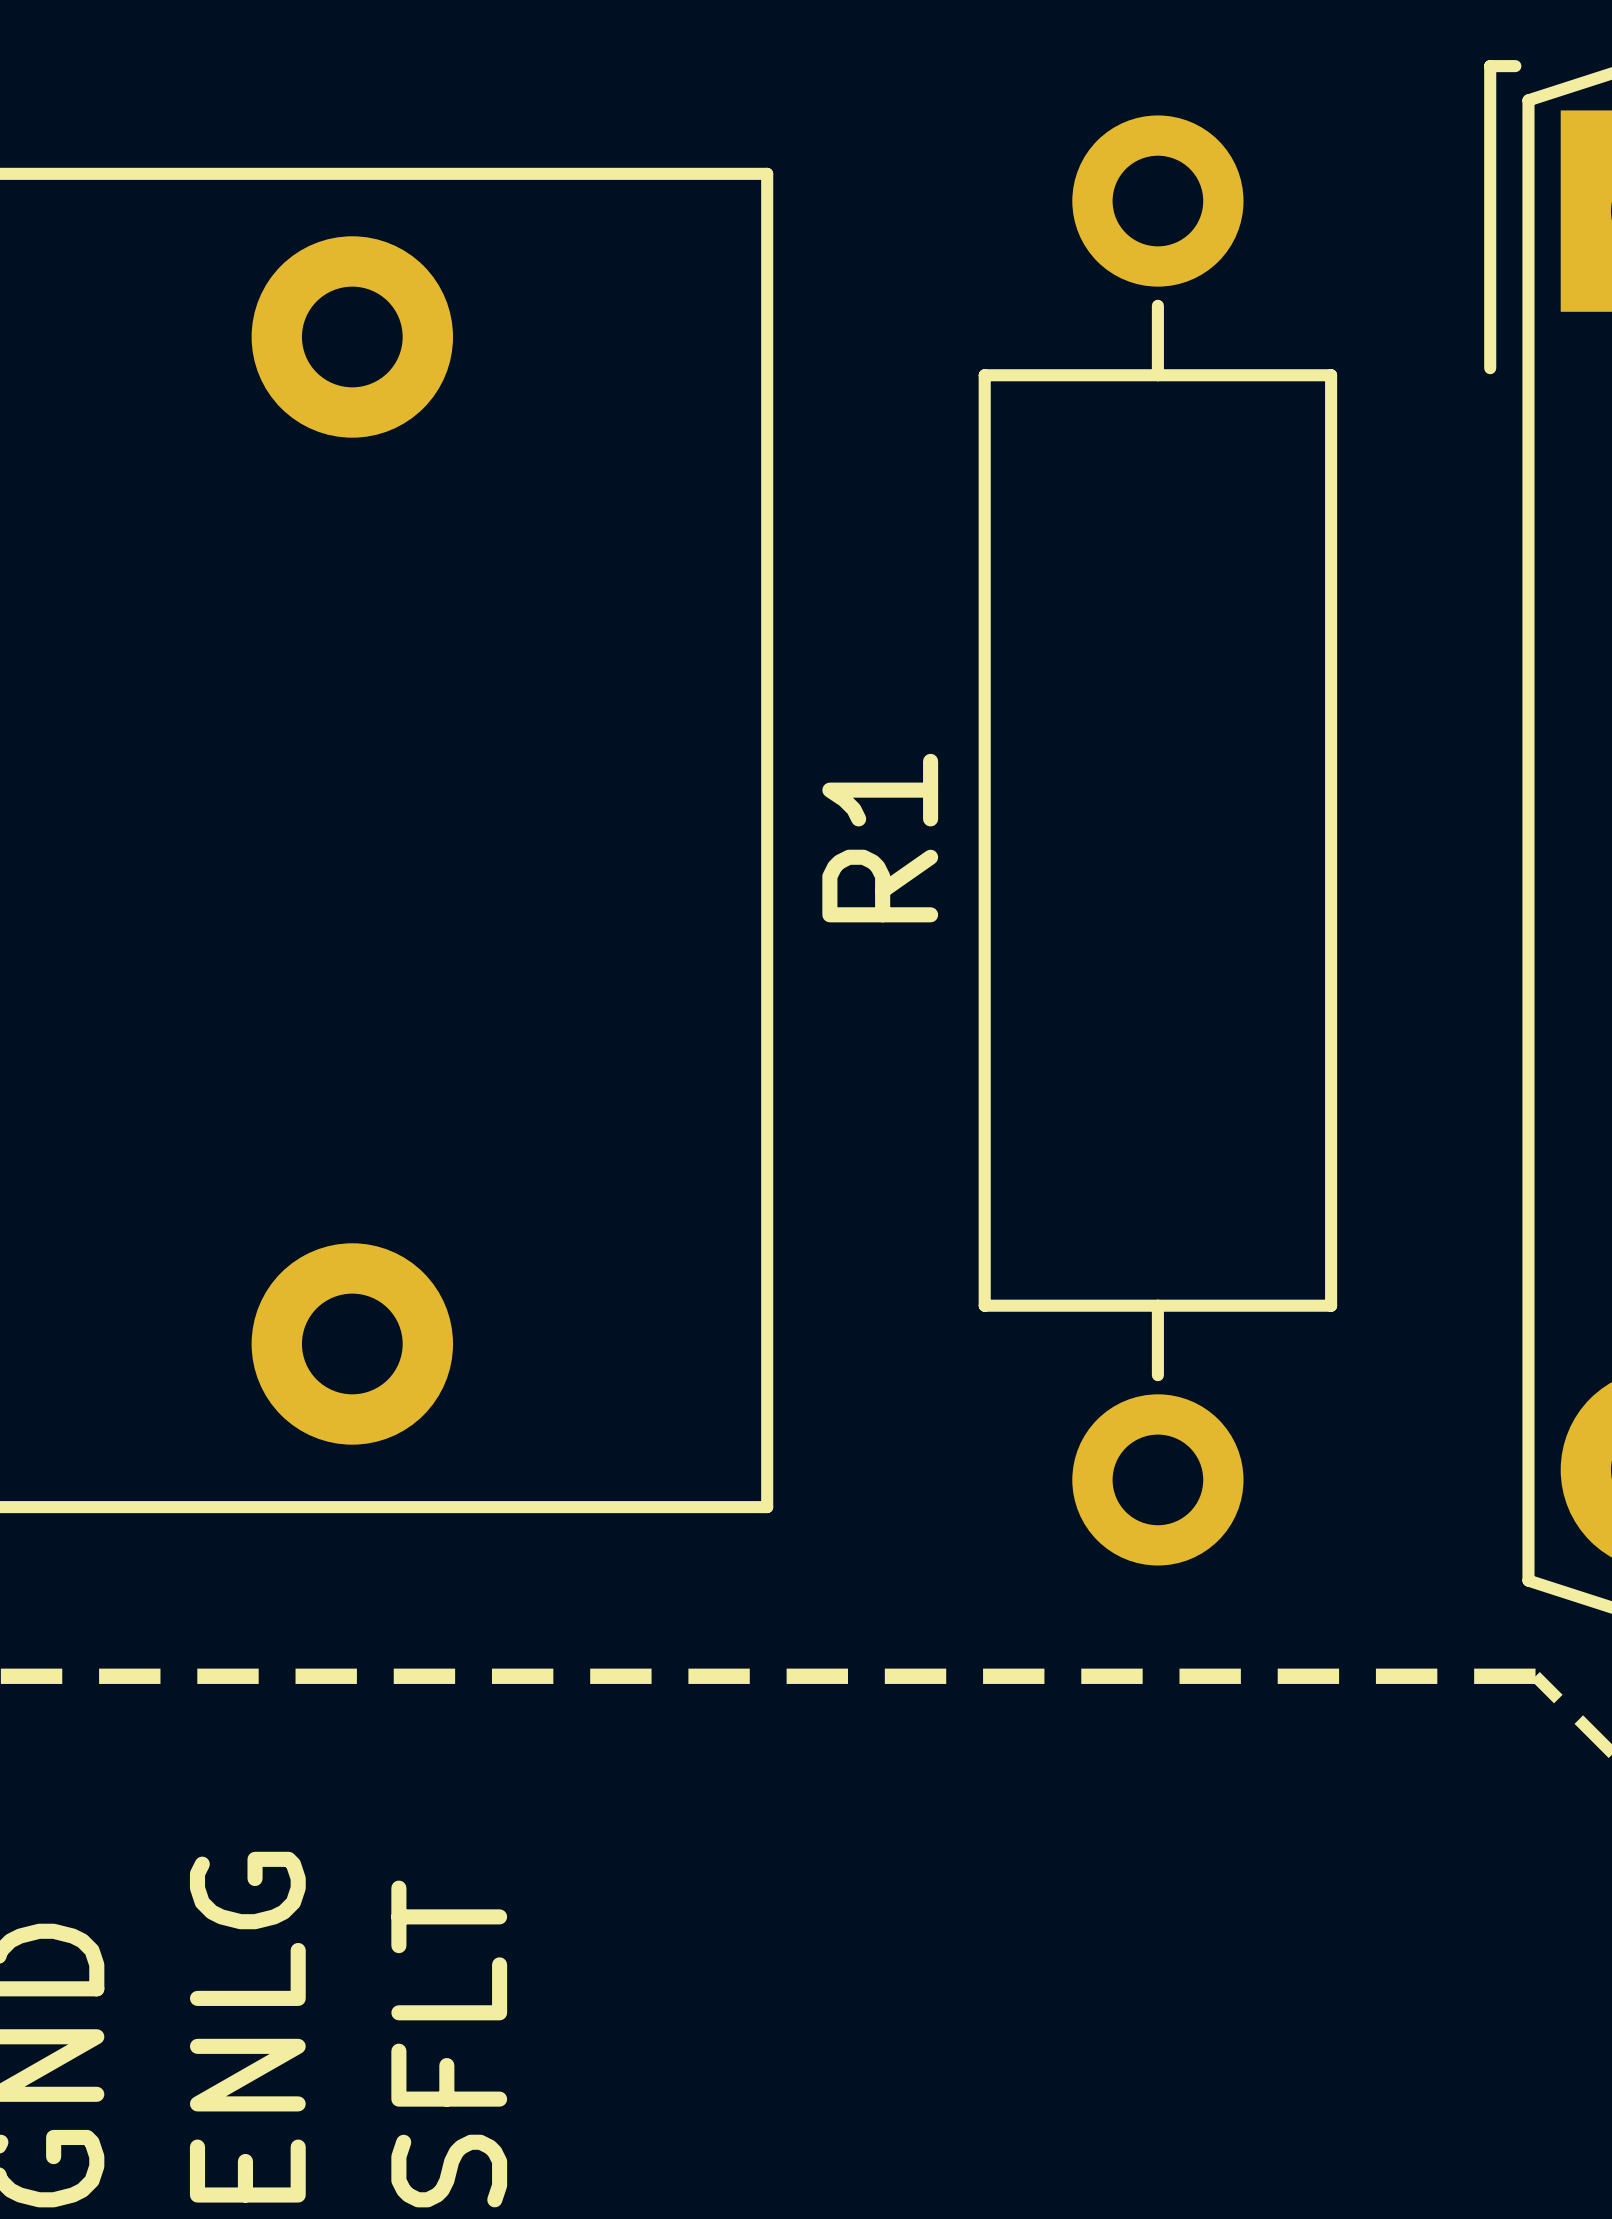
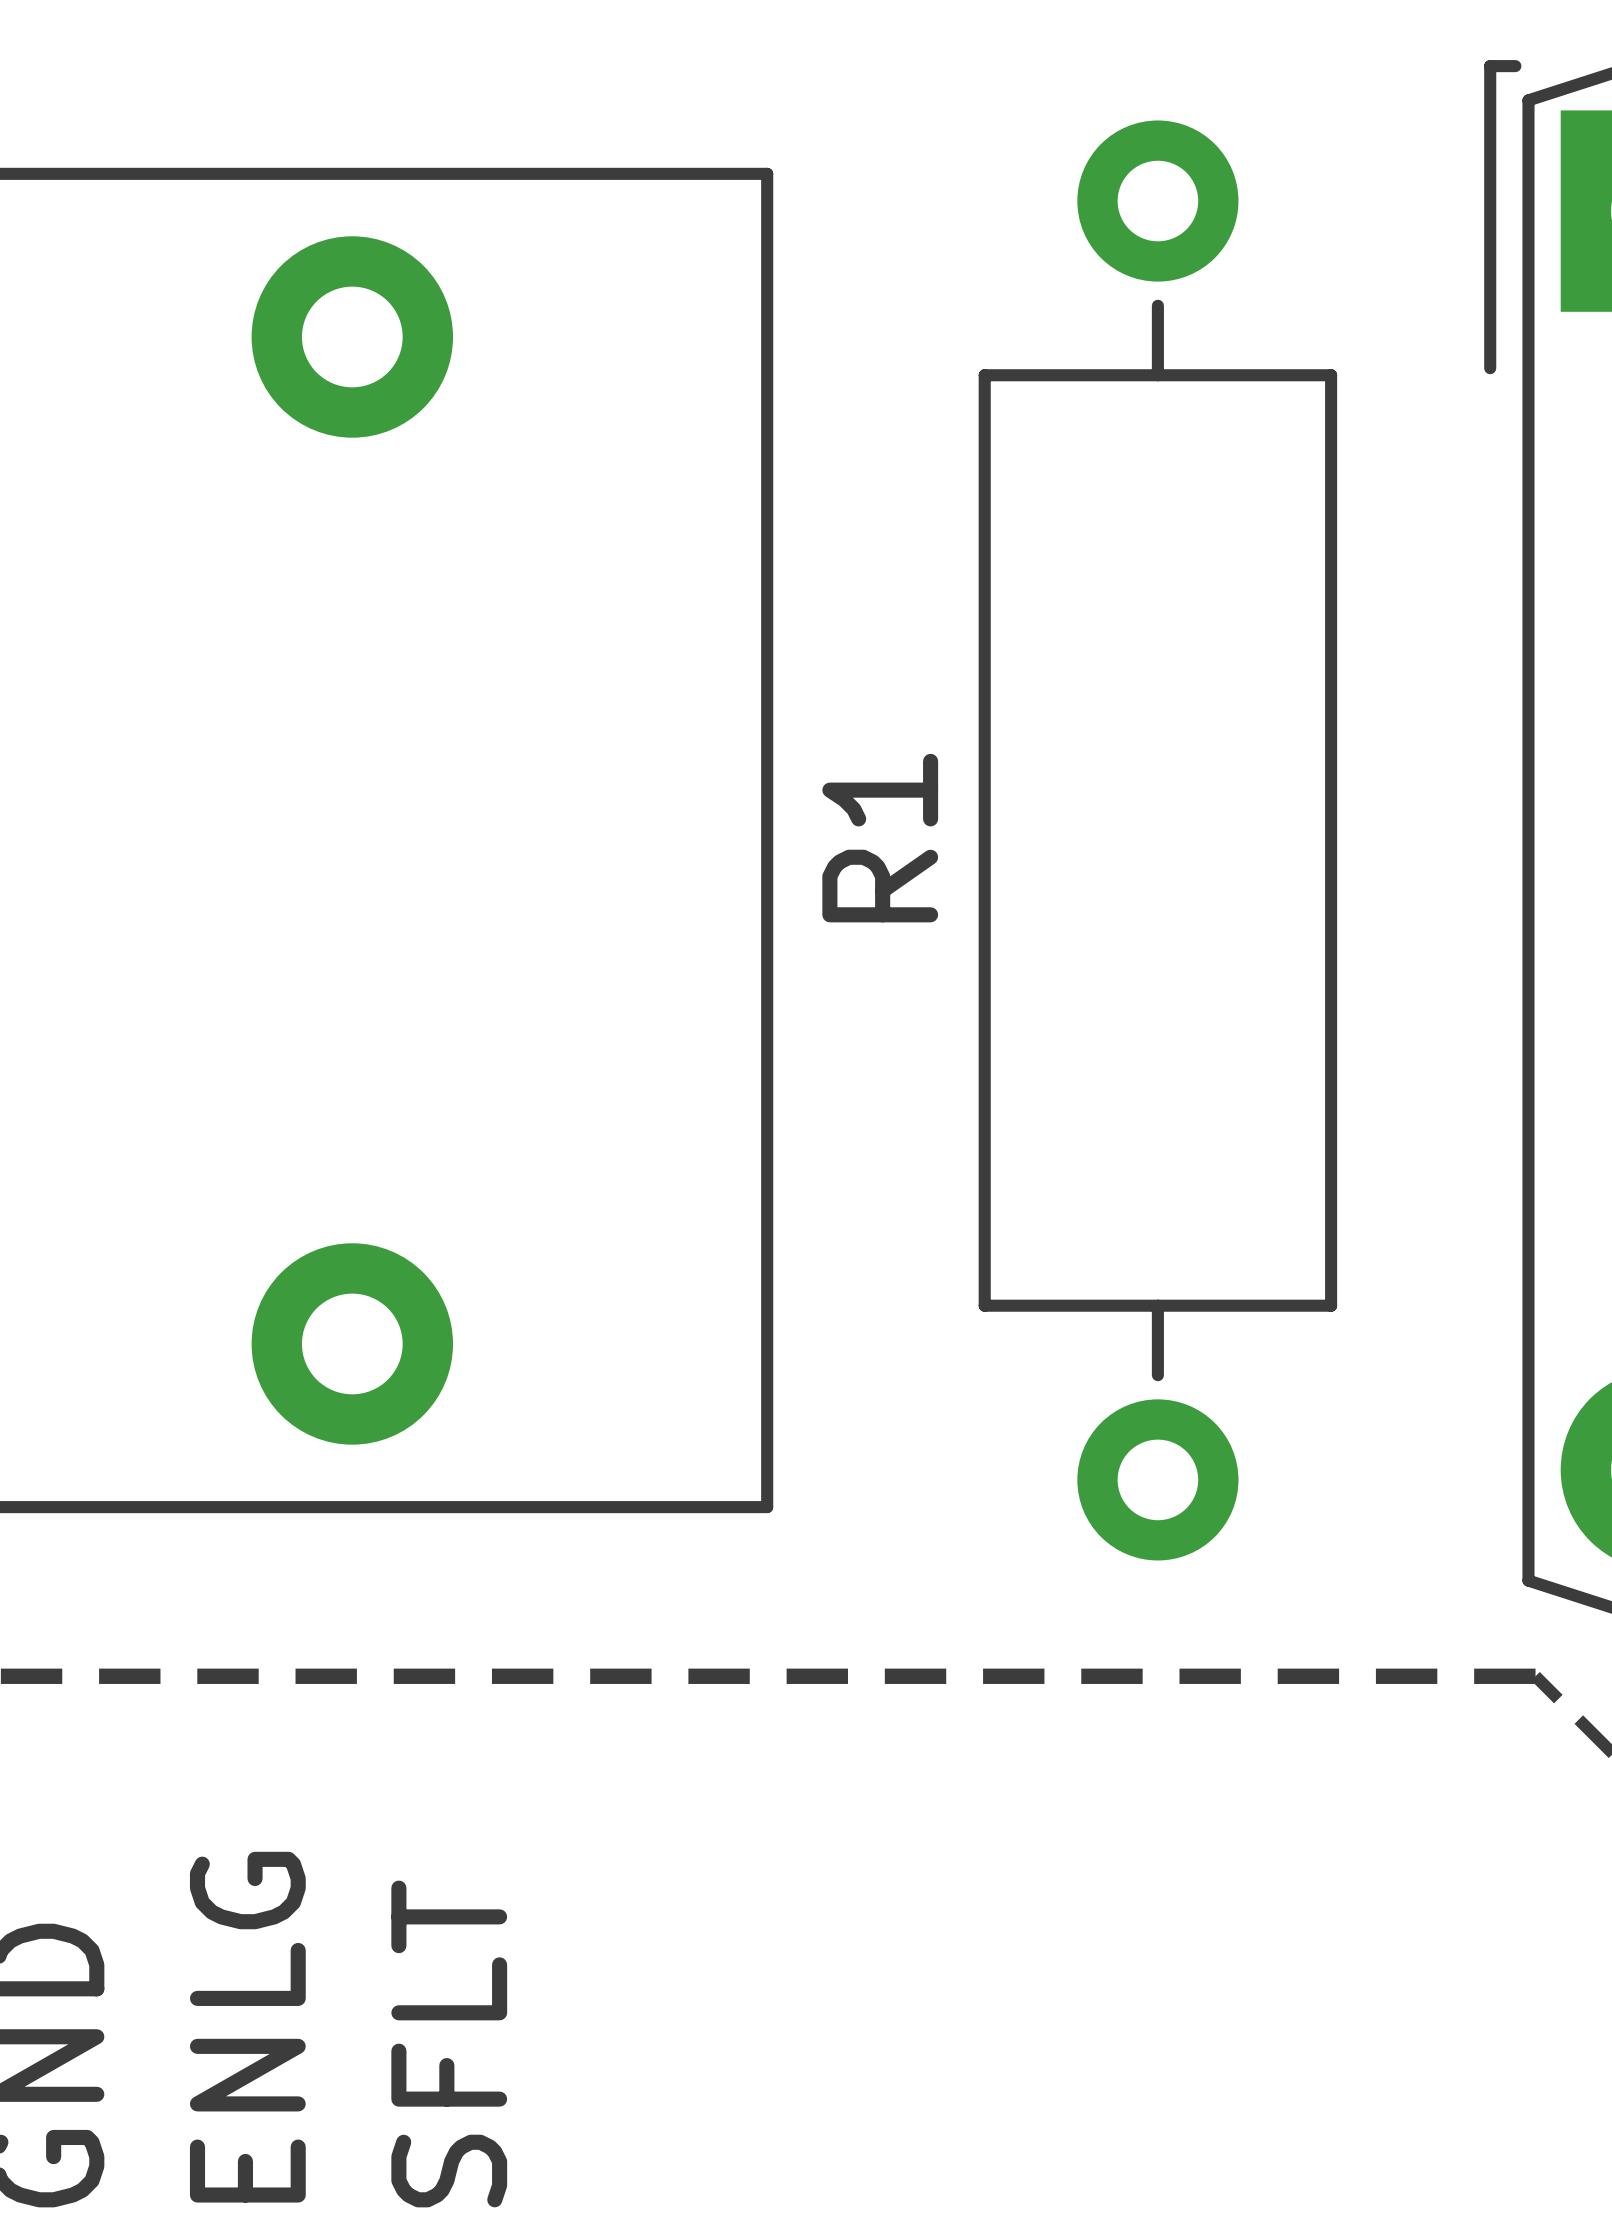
R1 footprint: [978, 115, 1338, 1566] -> [978, 120, 1338, 1561]

